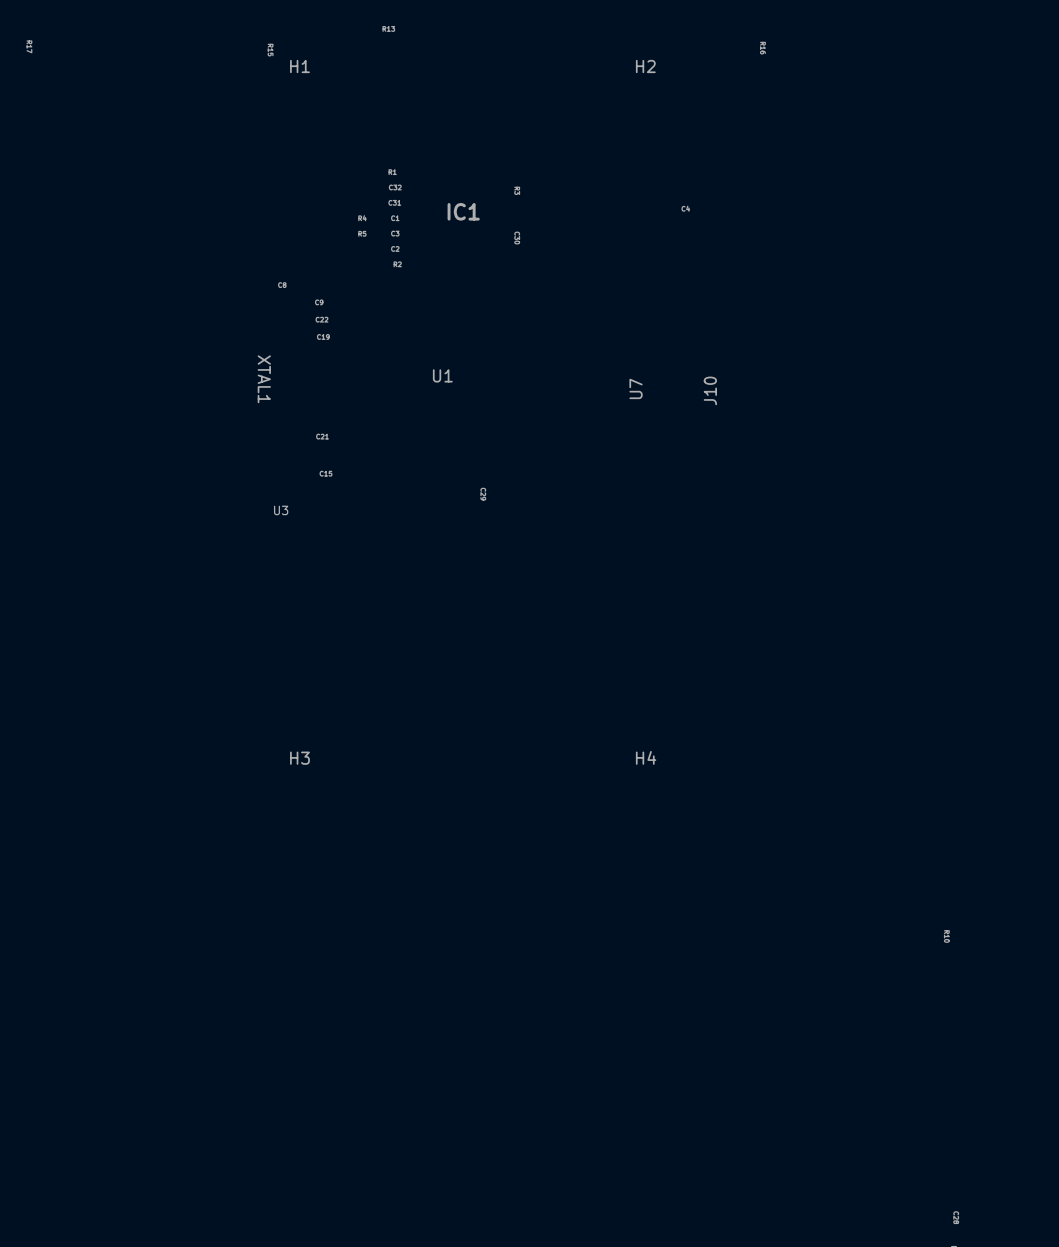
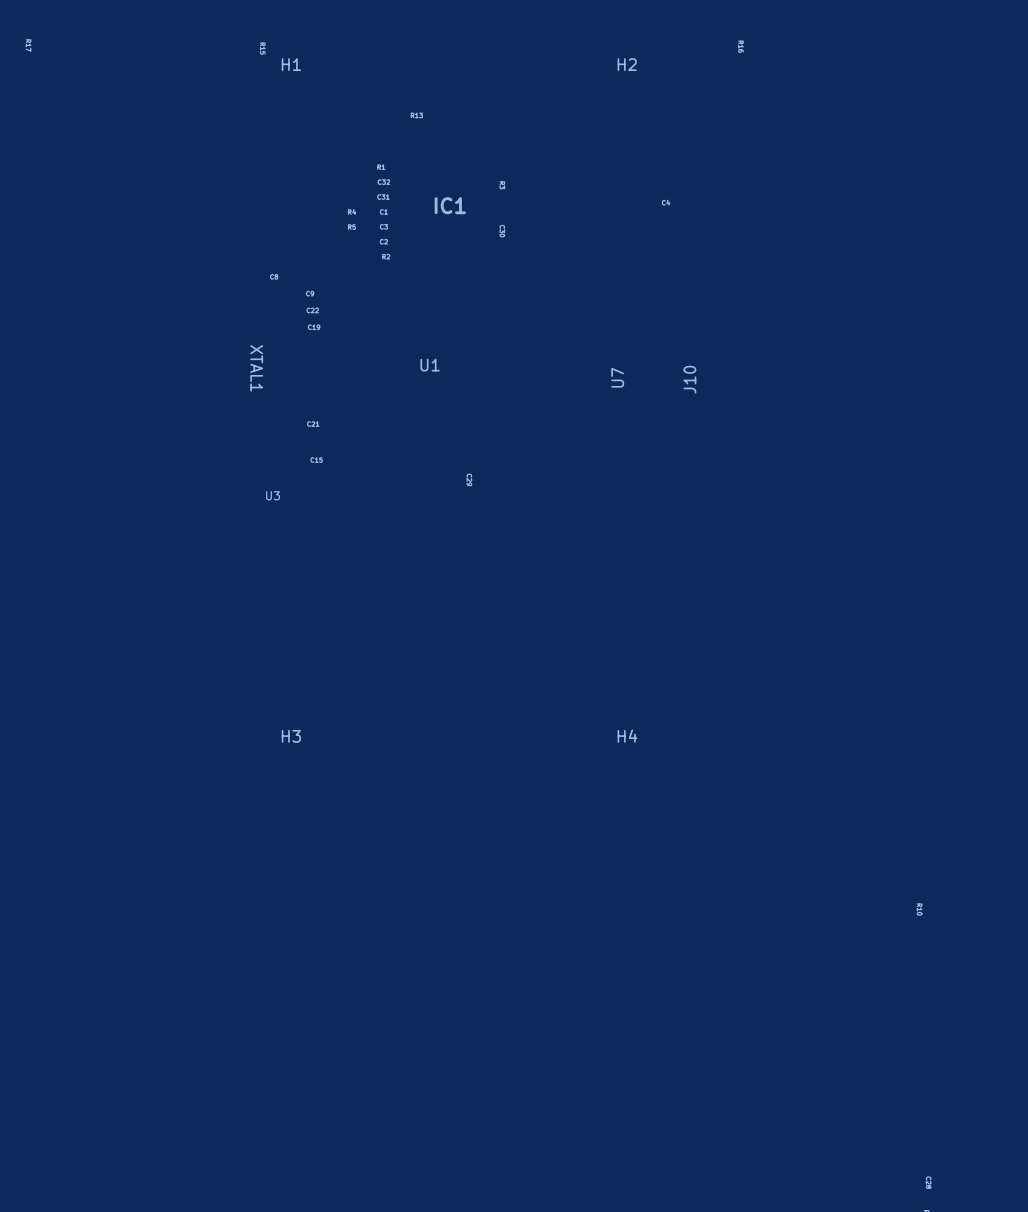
part position: (388, 28) -> (416, 115)

